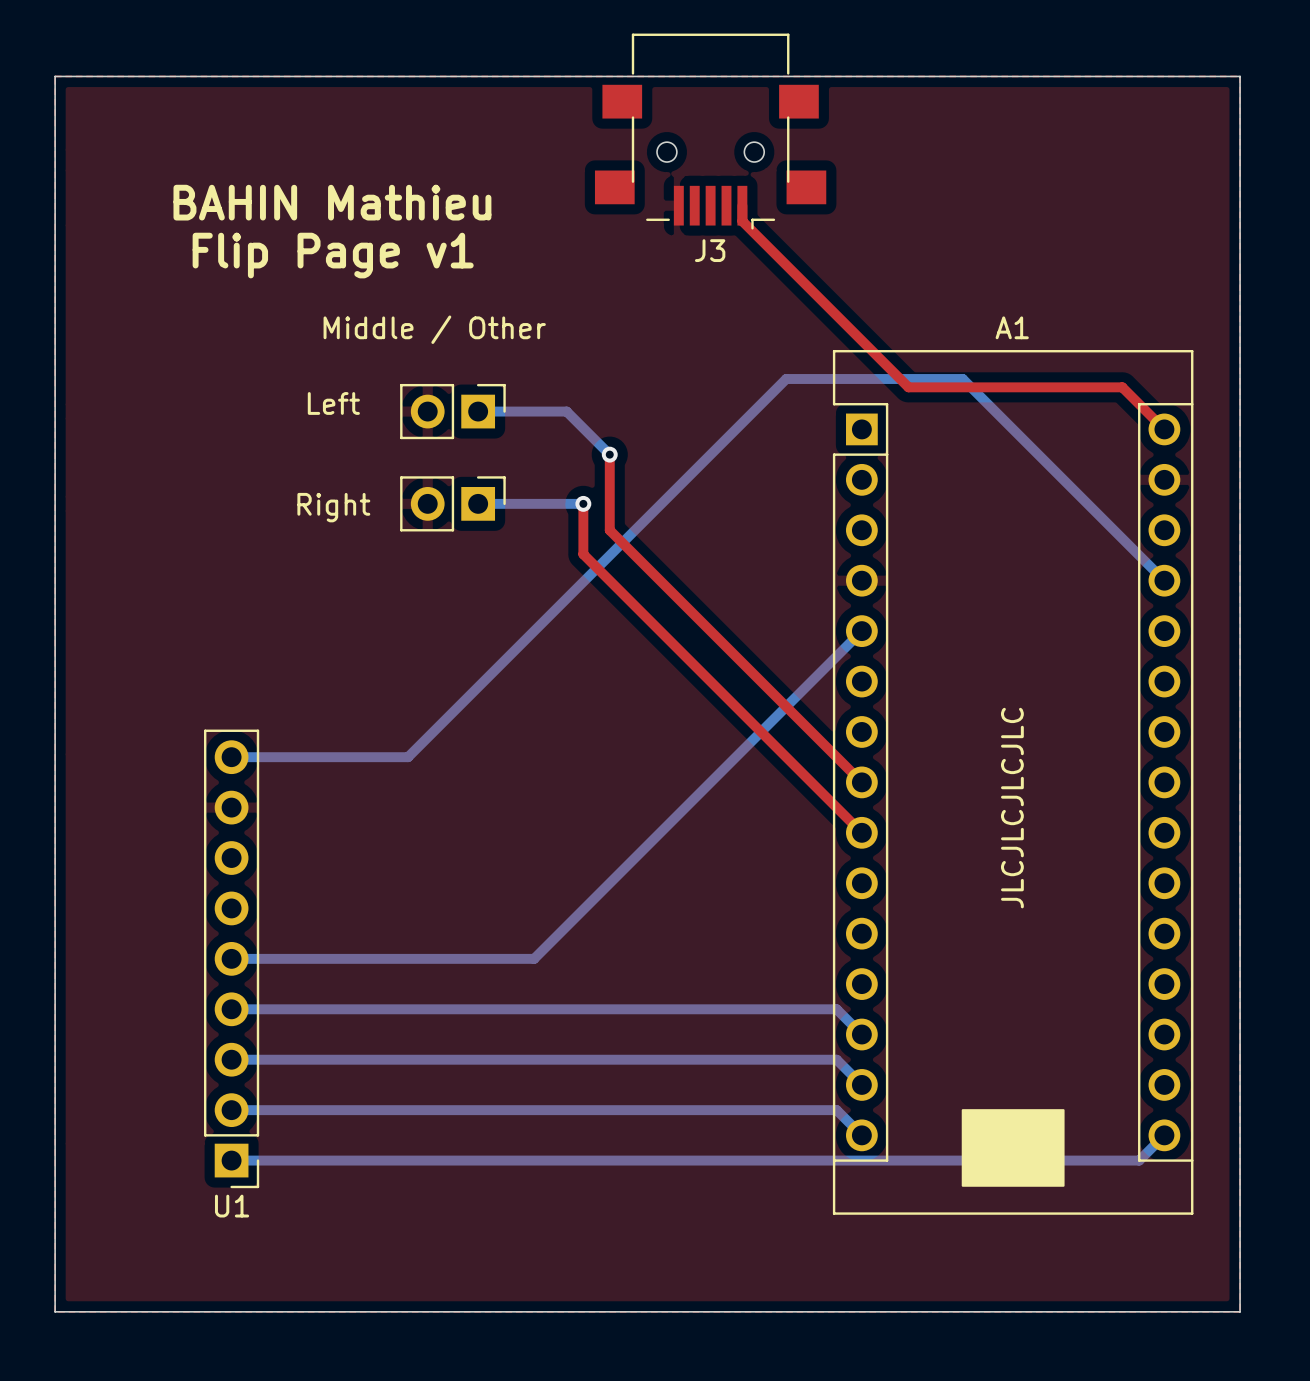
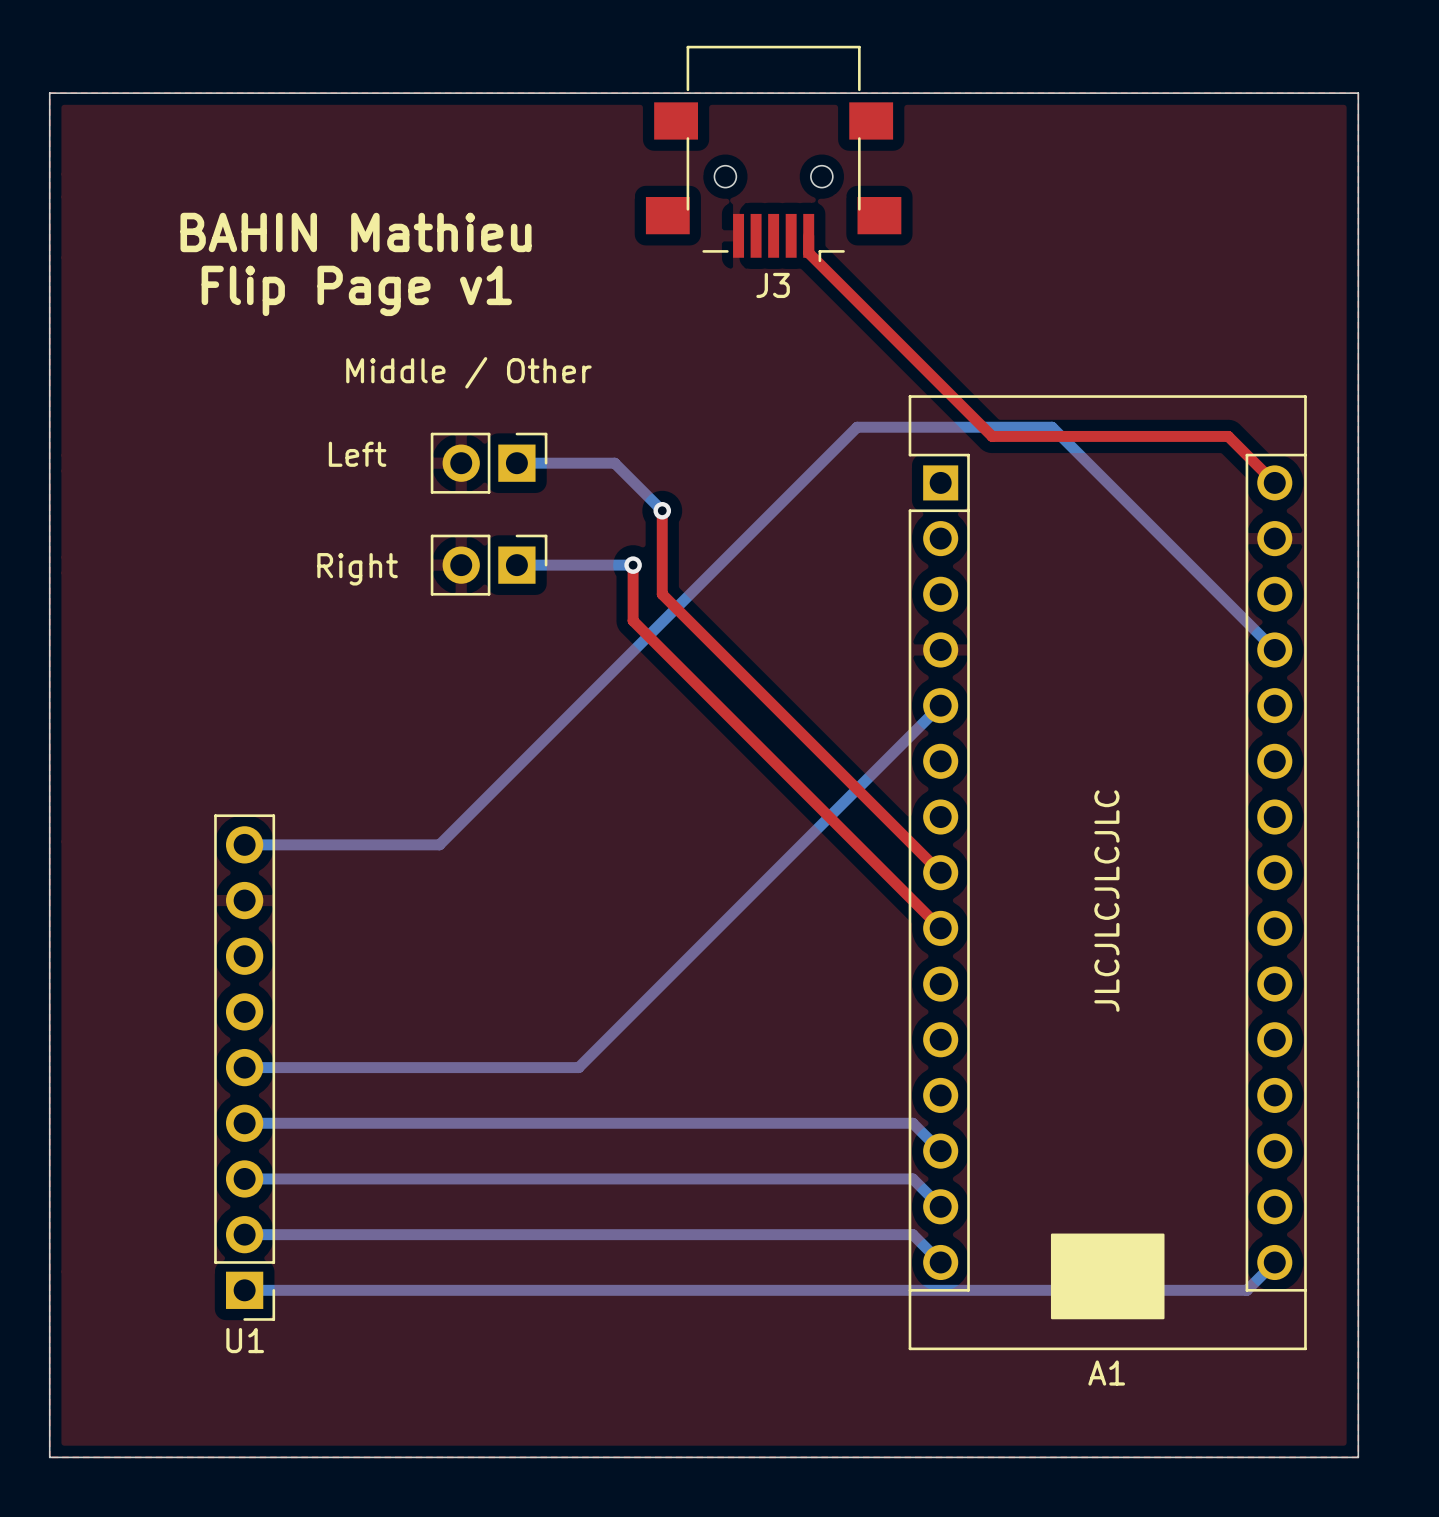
A1 name position: A1 (1012, 327) -> A1 (1106, 1373)

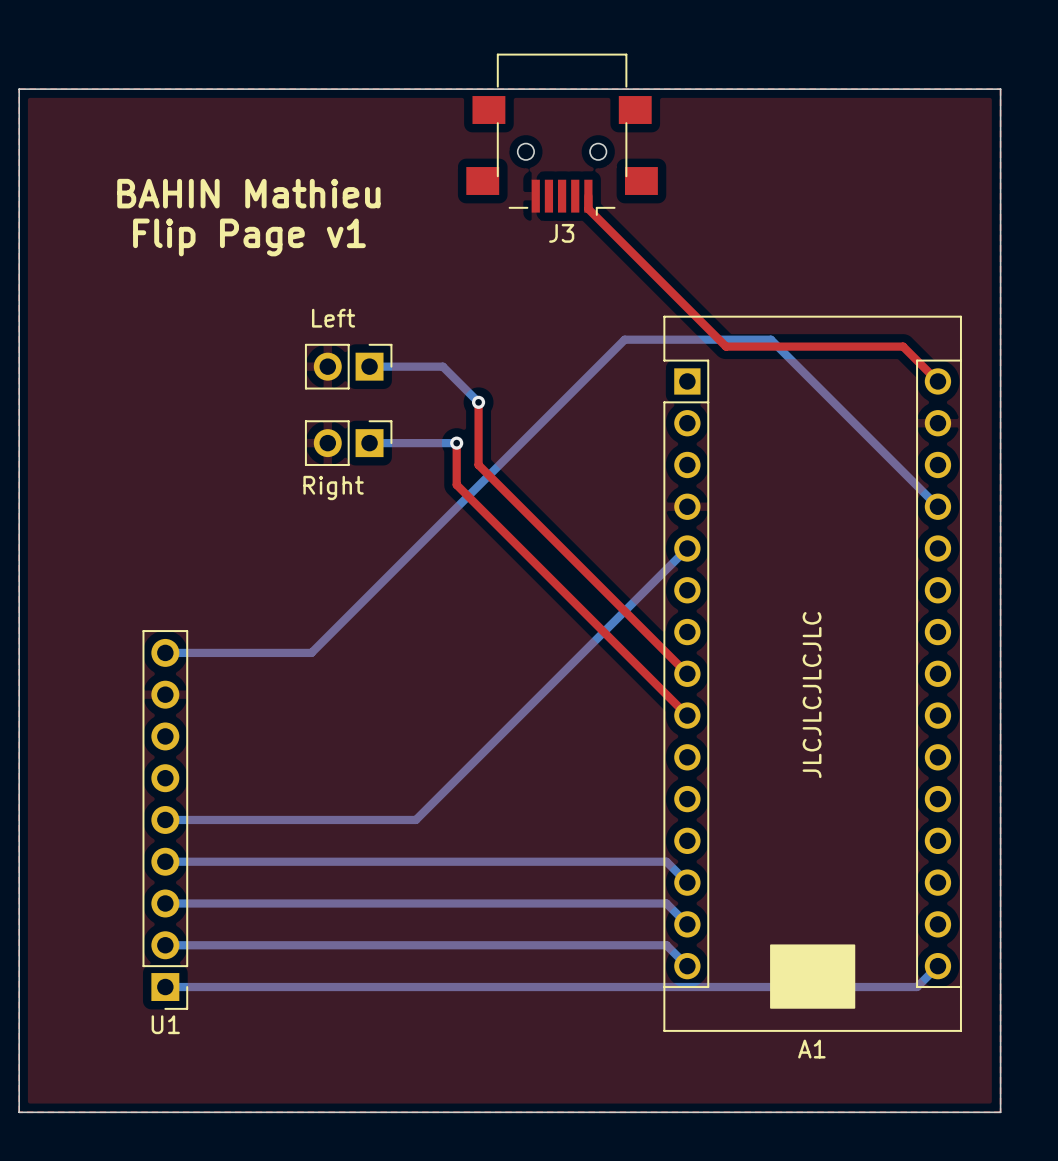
text: Middle / Other (468, 372) -> none
text position: Left (357, 454) -> Left (333, 318)
text position: Right (357, 569) -> Right (333, 487)

